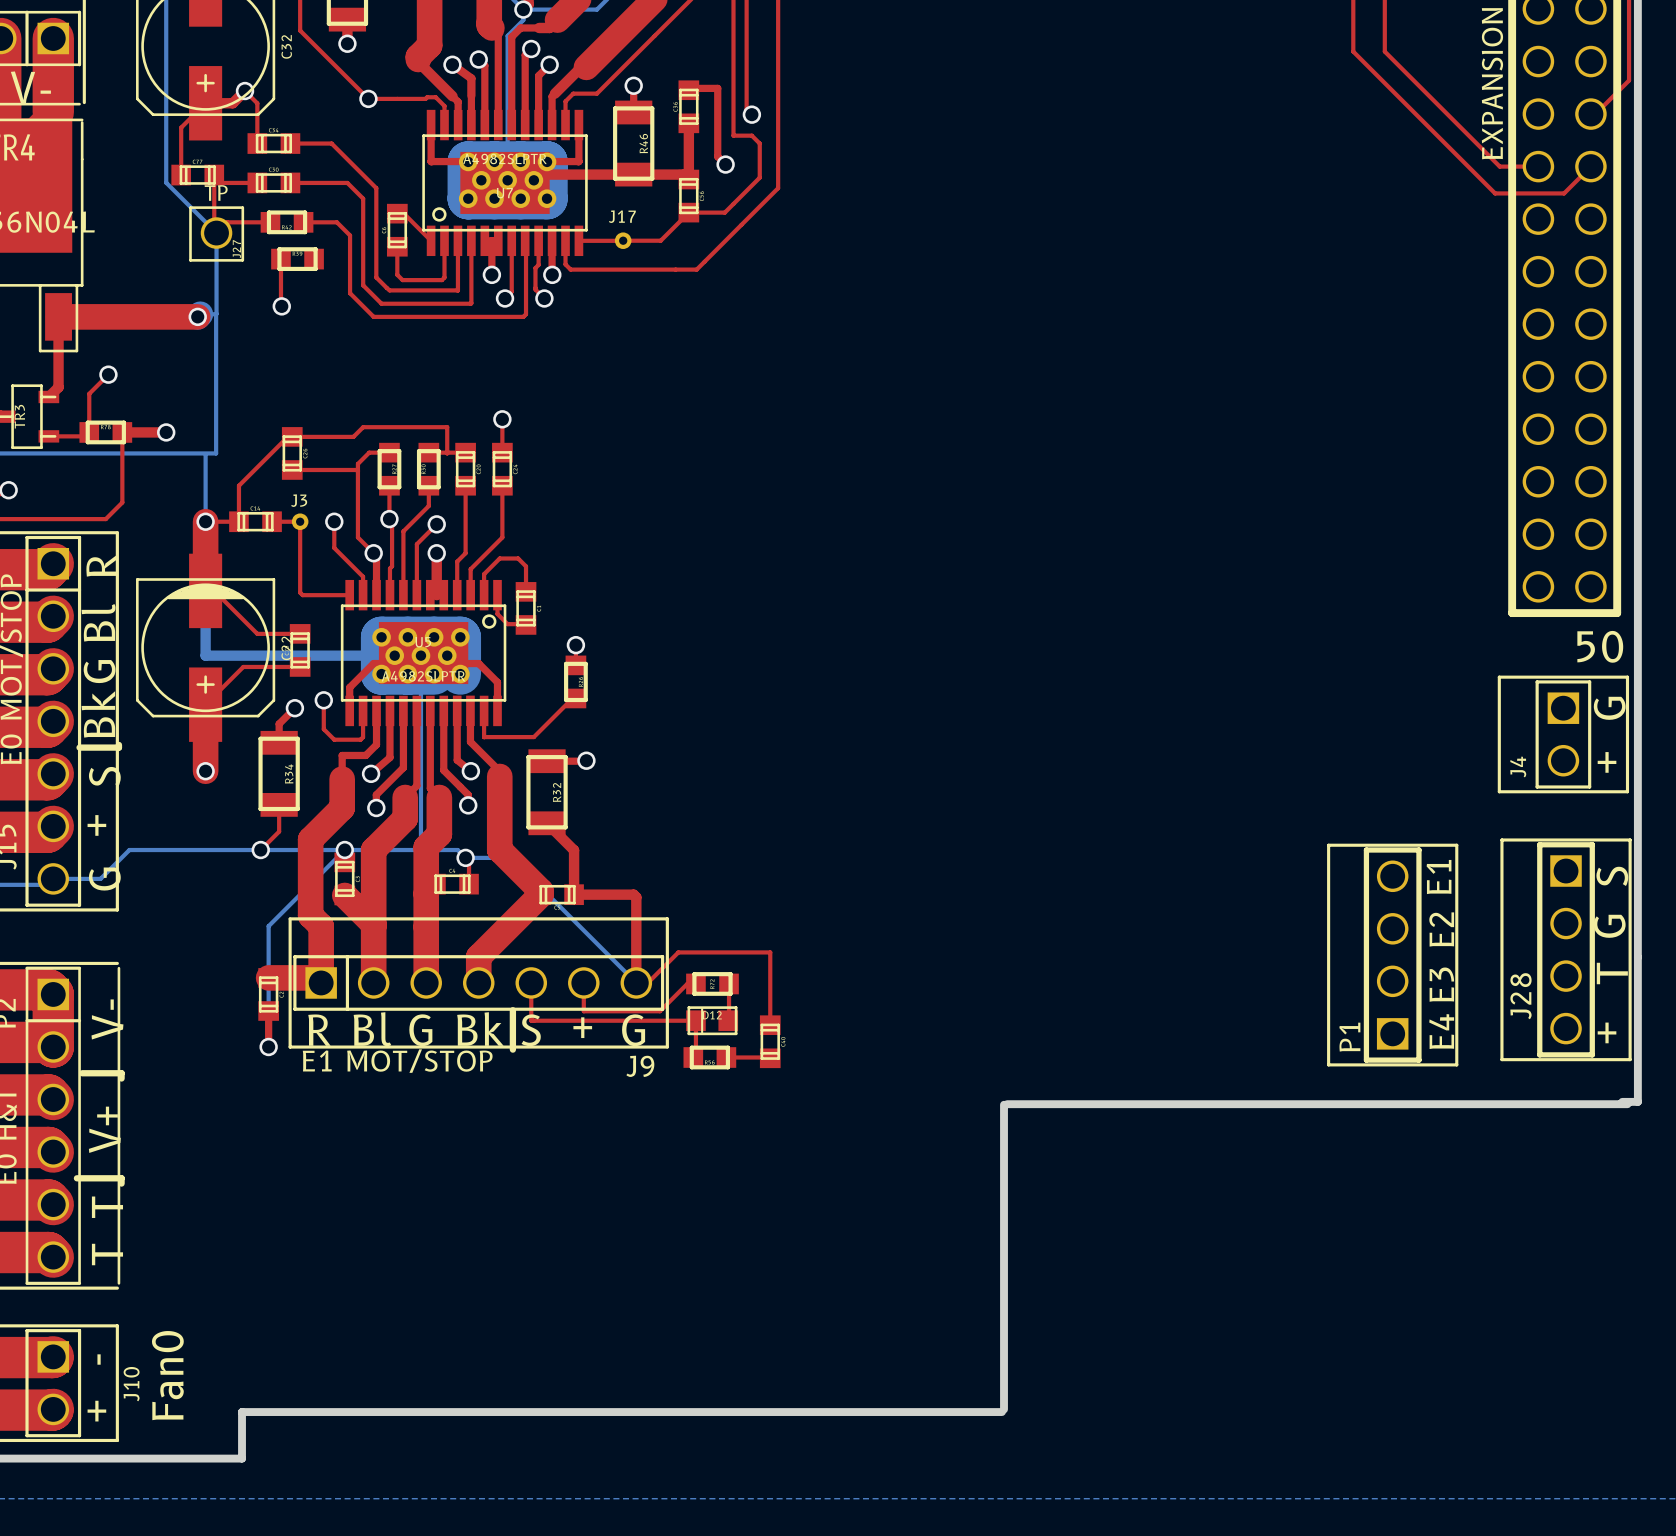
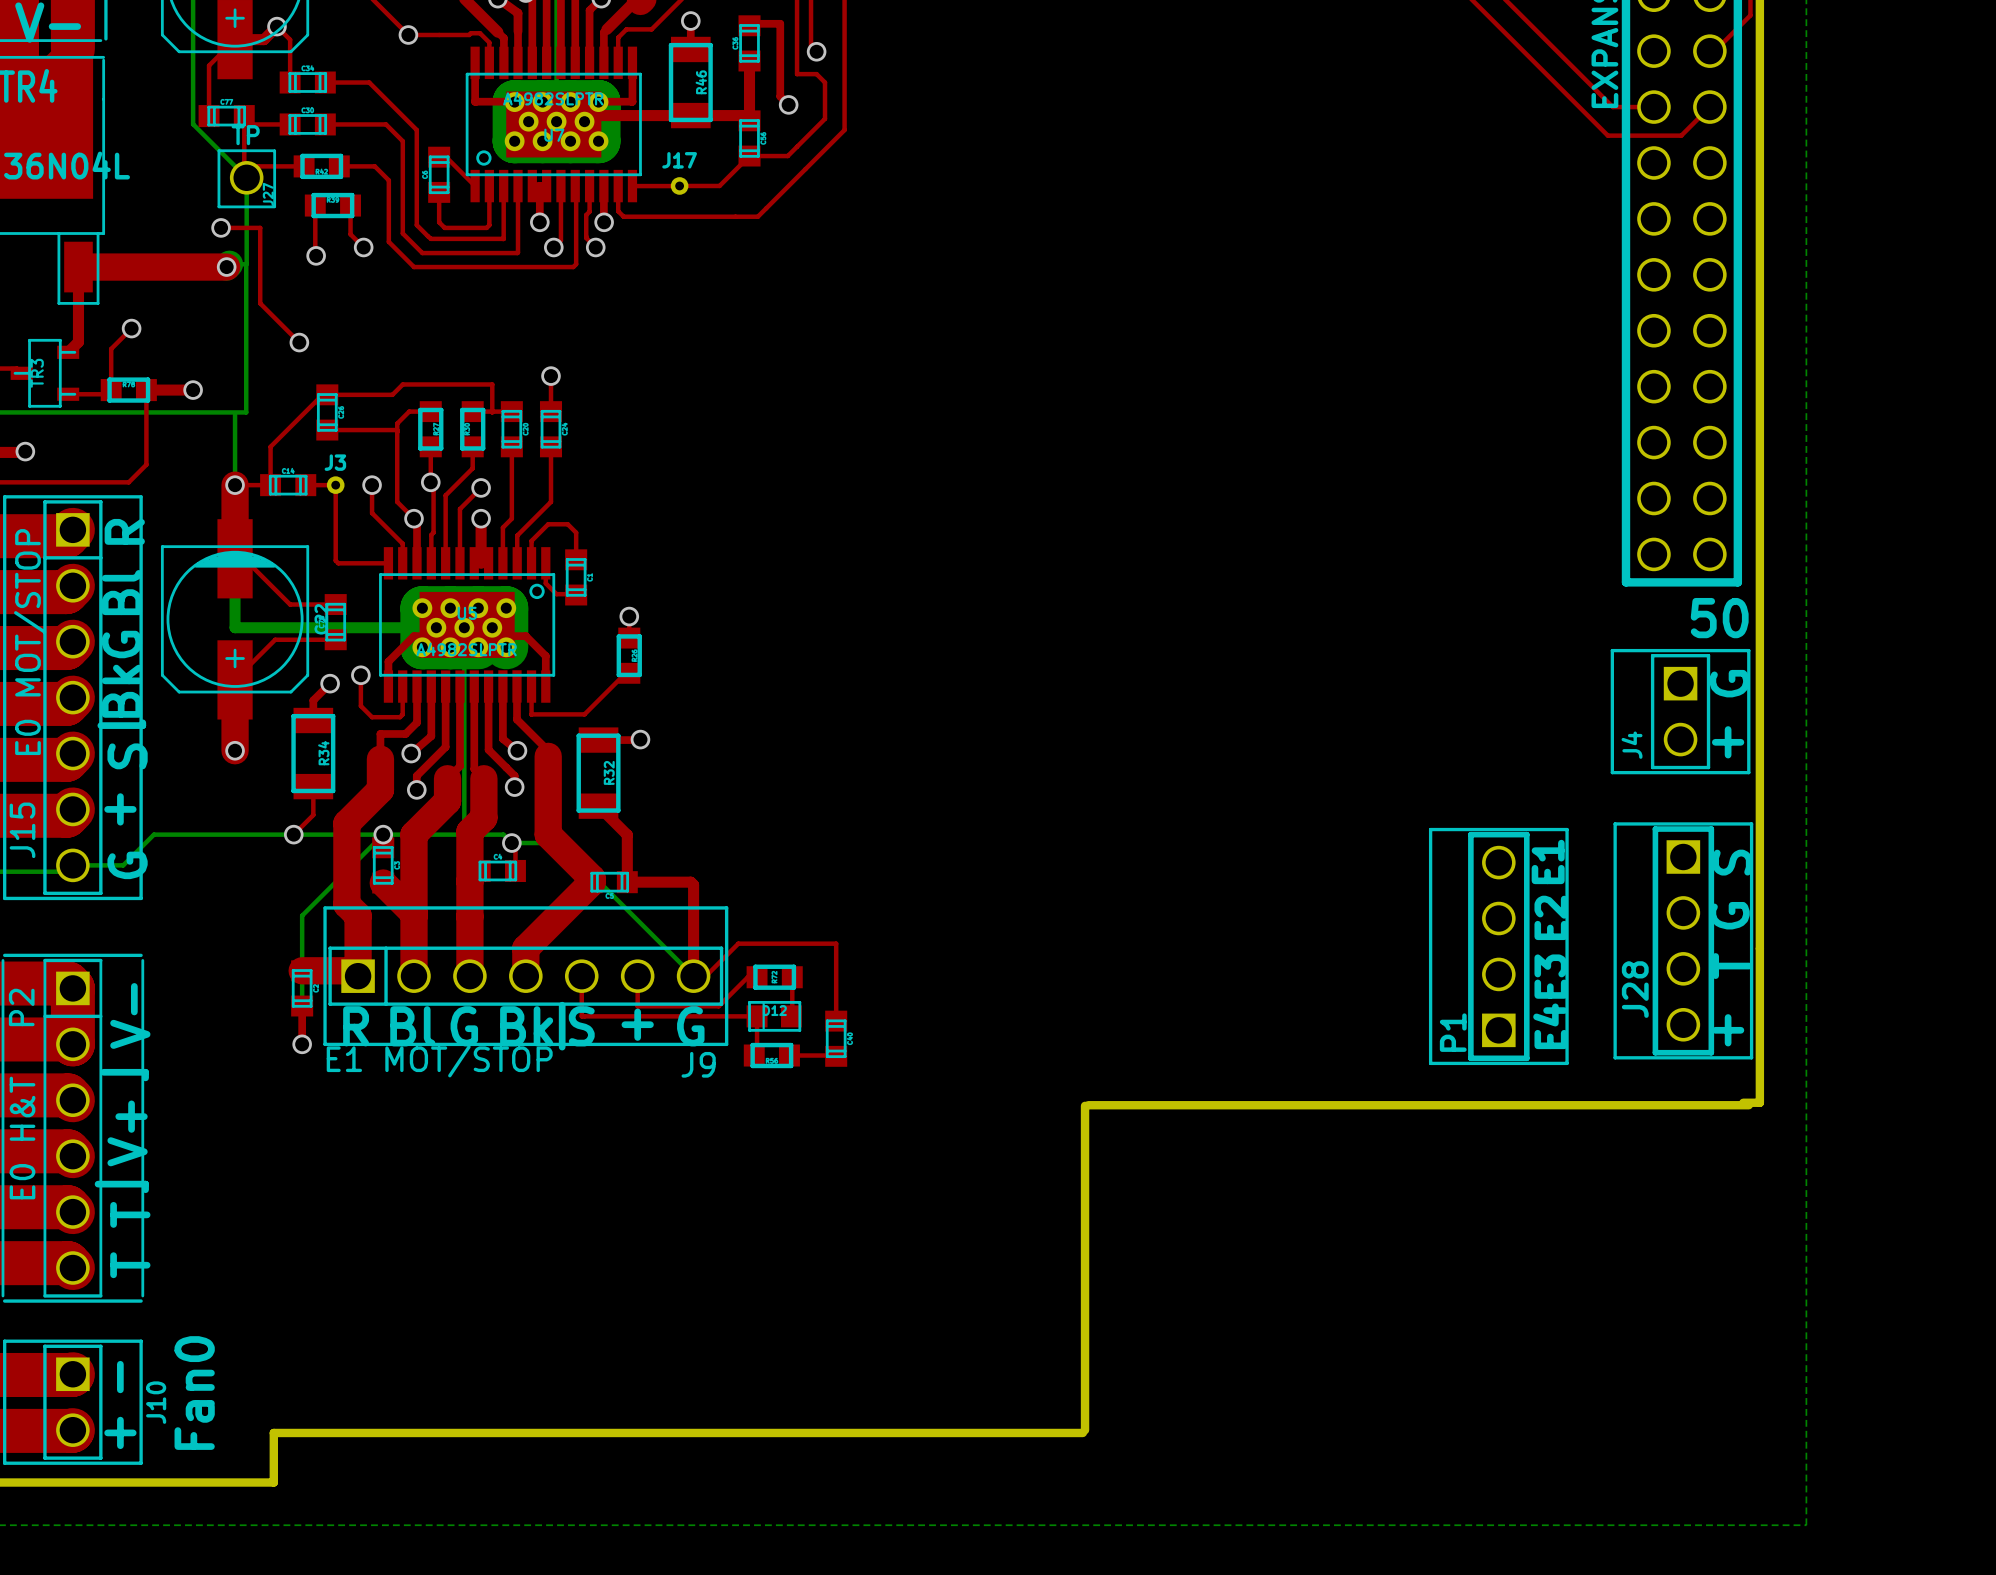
top track: none -> (350, 205) (350, 234) (363, 247)
top track: none -> (221, 227) (260, 227) (260, 303) (299, 342)
via: none -> (221, 227)
via: none -> (363, 247)
via: none -> (299, 342)

